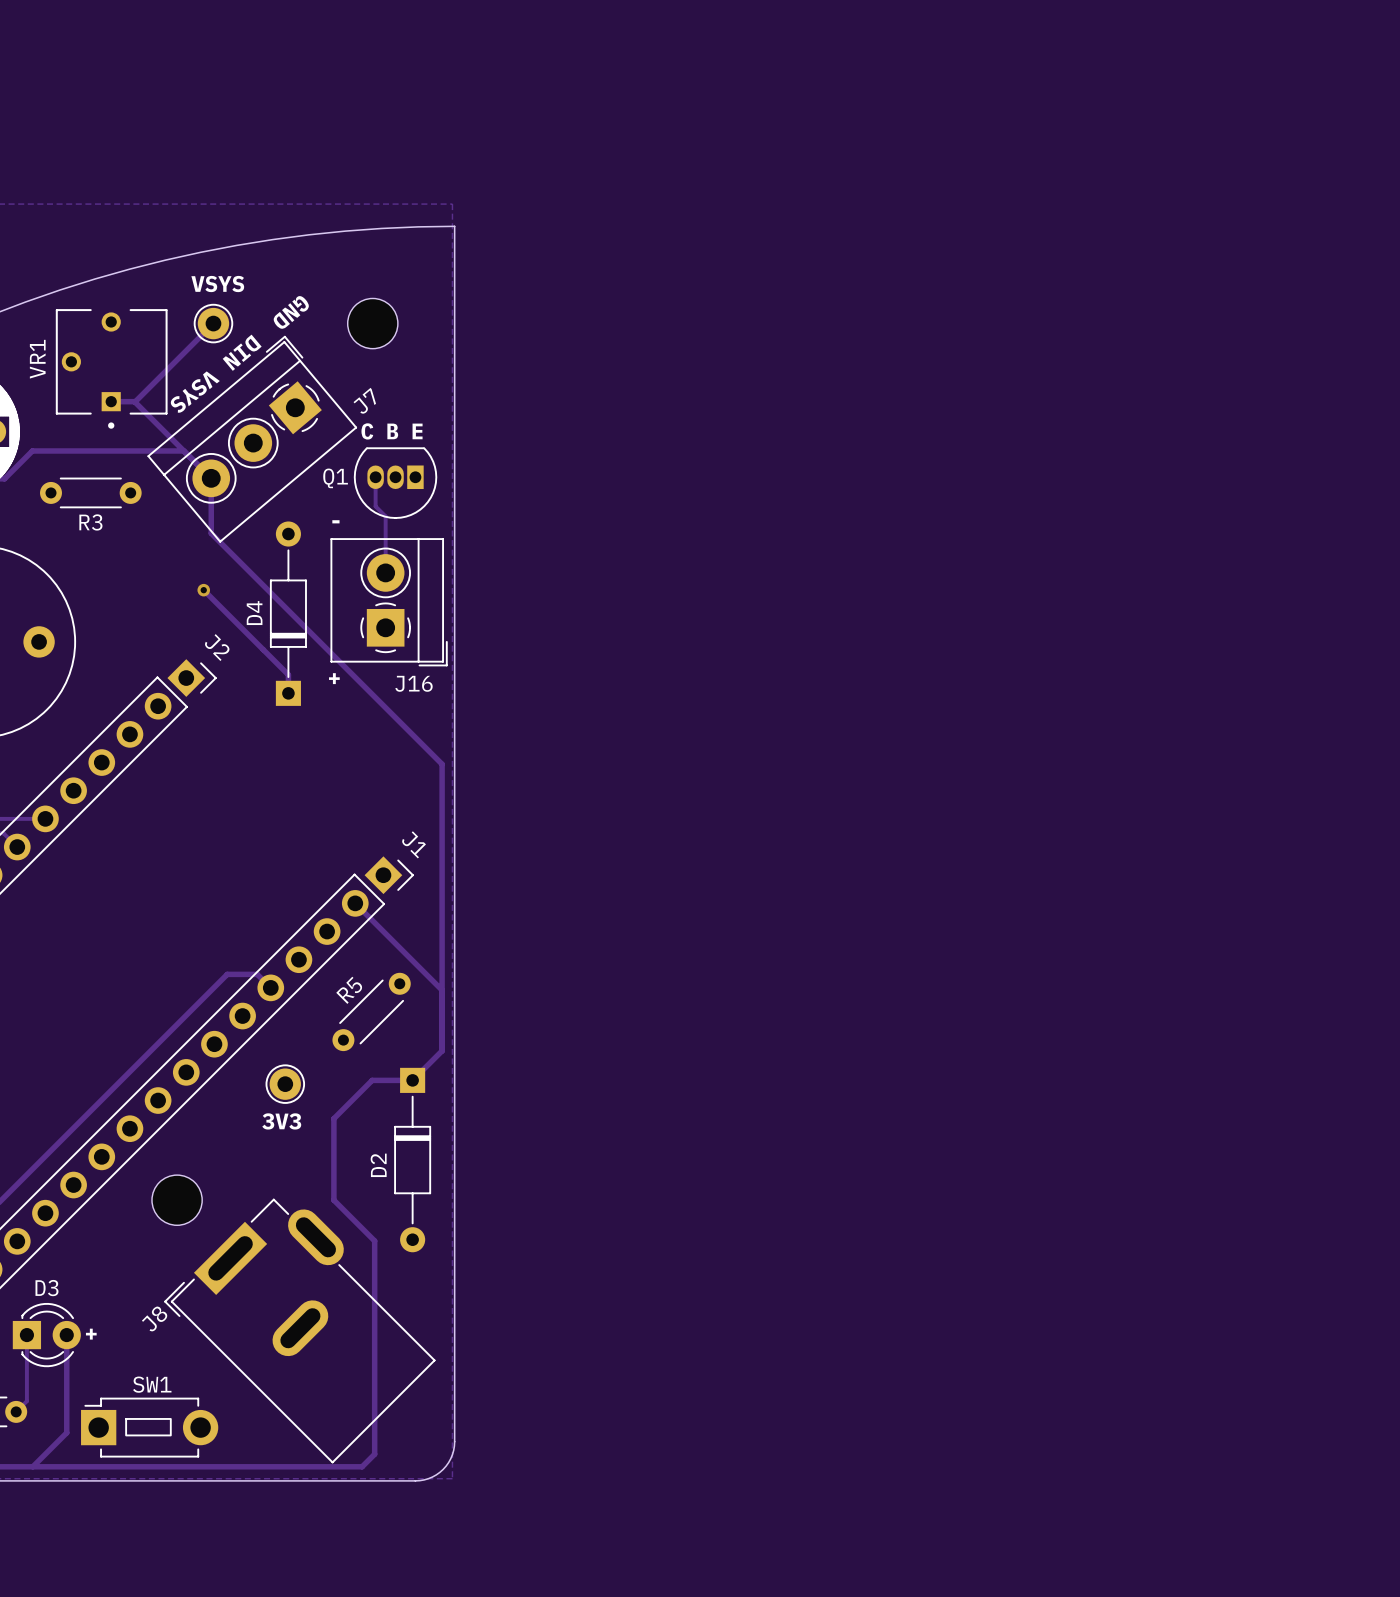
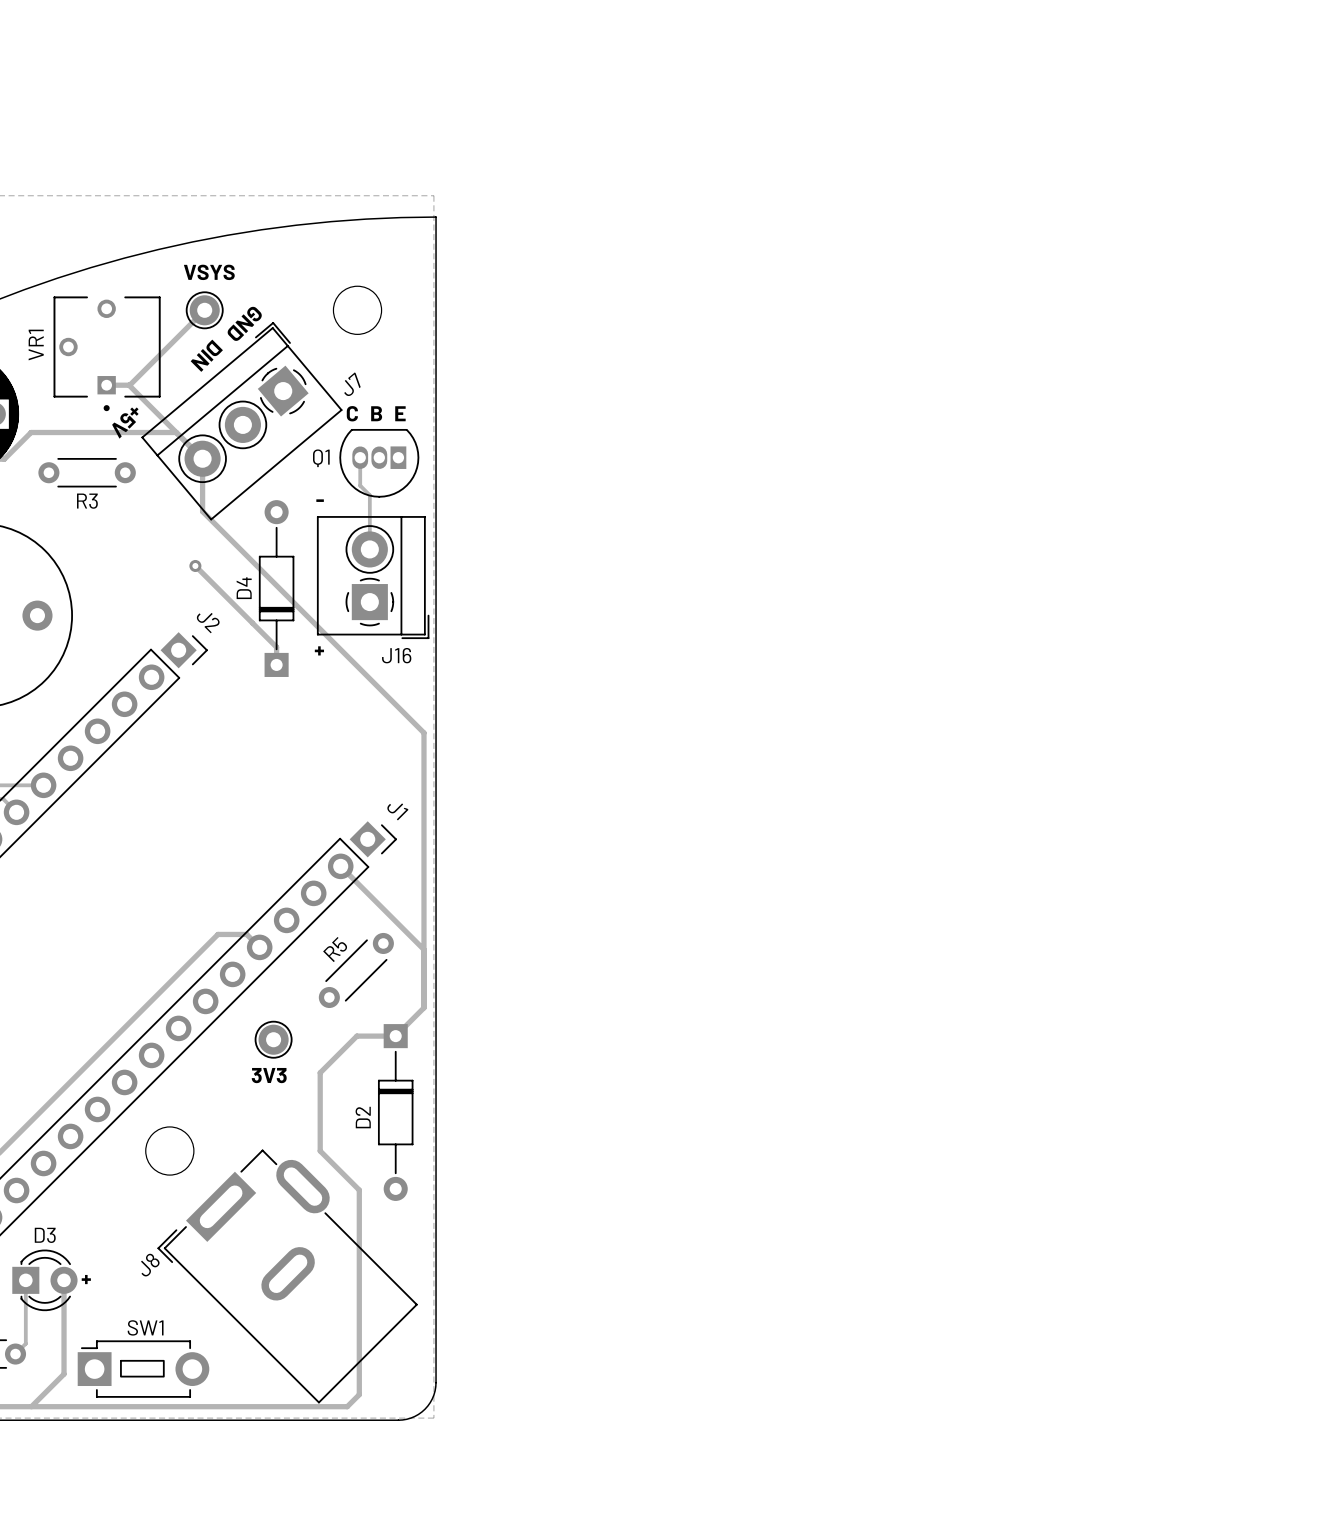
text: GND (291, 312) -> none
text: DIN (242, 352) -> GND (244, 323)
text: VSYS (195, 392) -> DIN (206, 355)
text: none -> +5V (125, 423)

